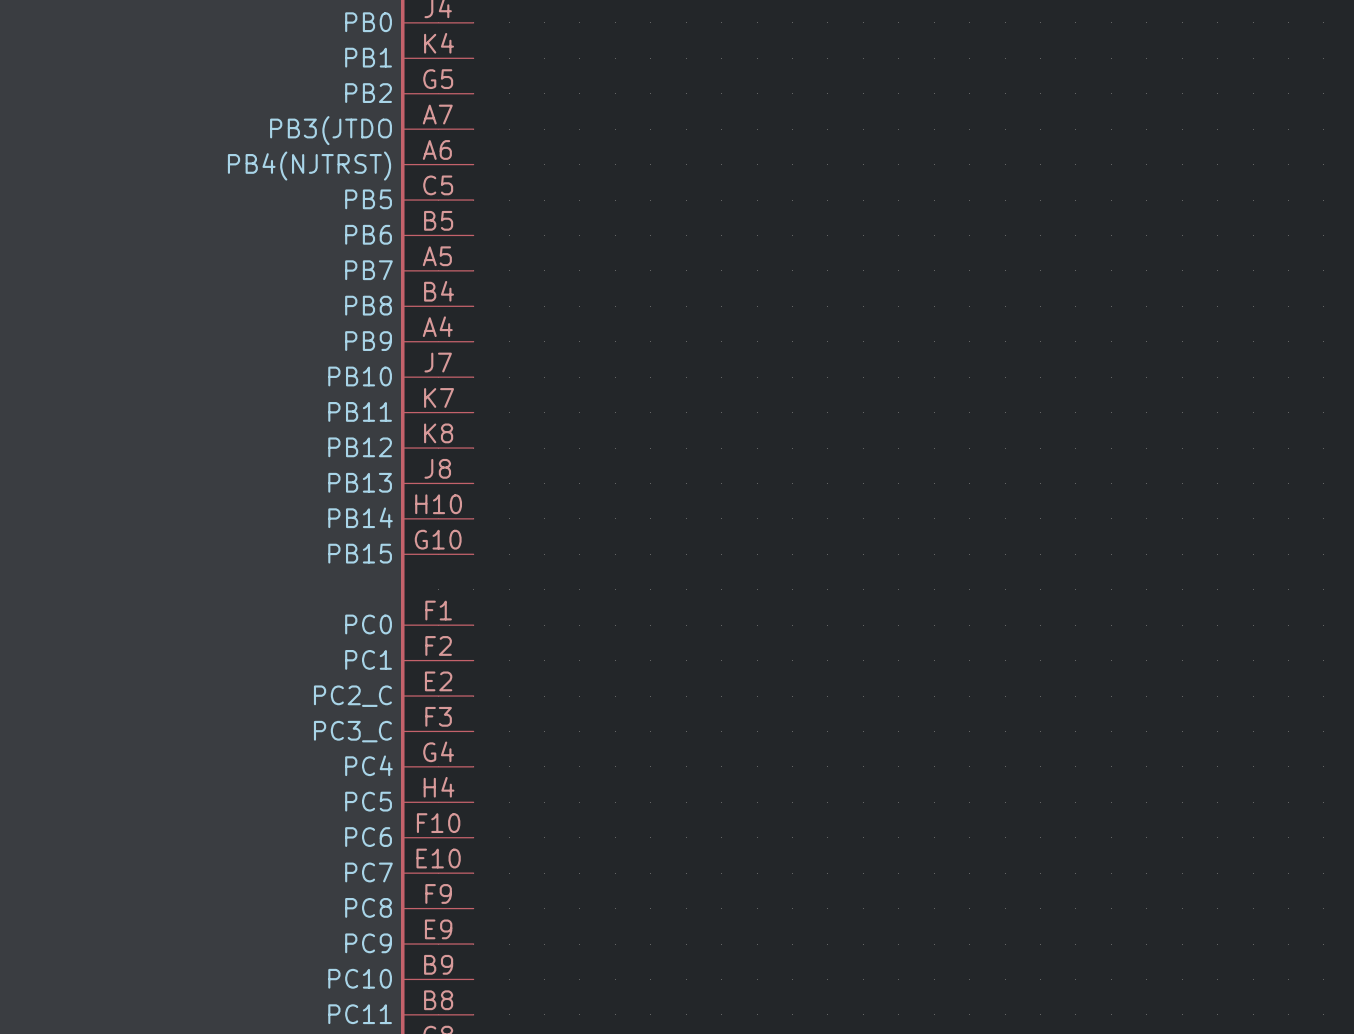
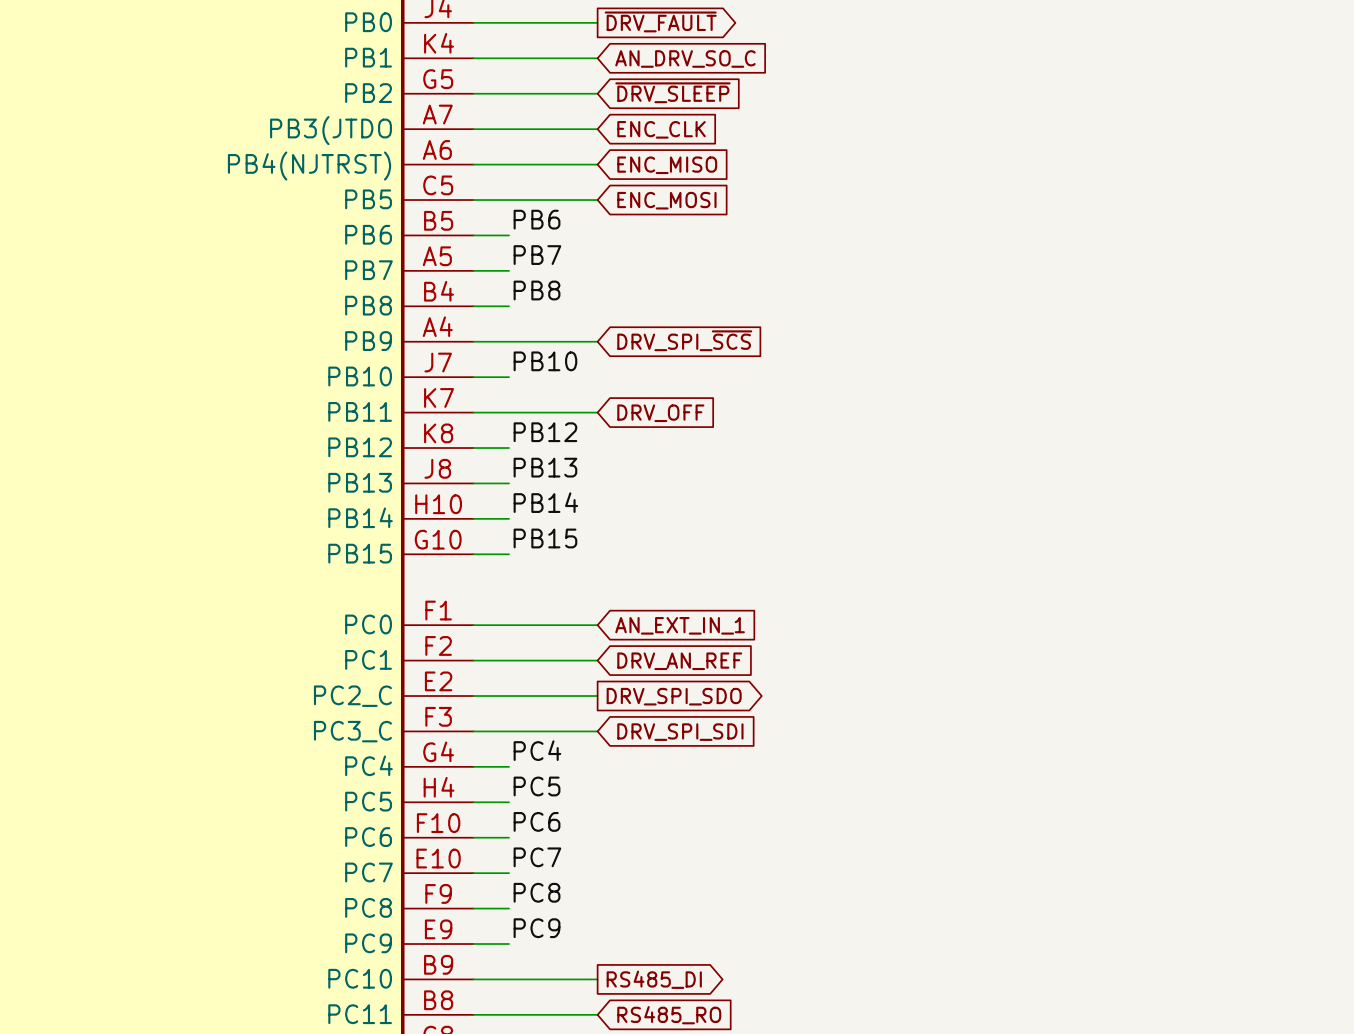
global label: none -> ~{DRV_FAULT} (660, 21)
wire: none -> (473, 22) (597, 22)
wire: none -> (473, 58) (597, 58)
global label: none -> AN_DRV_SO_C (685, 58)
global label: none -> ~{DRV_SLEEP} (672, 92)
wire: none -> (473, 93) (597, 93)
wire: none -> (473, 129) (597, 129)
global label: none -> ENC_CLK (661, 129)
wire: none -> (473, 164) (597, 164)
global label: none -> ENC_MISO (667, 165)
wire: none -> (473, 200) (597, 200)
global label: none -> ENC_MOSI (666, 200)
label: none -> PB6 (537, 219)
wire: none -> (473, 235) (509, 235)
label: none -> PB7 (537, 255)
wire: none -> (473, 270) (509, 270)
label: none -> PB8 (537, 290)
wire: none -> (473, 306) (509, 306)
global label: none -> DRV_SPI_~{SCS} (684, 340)
wire: none -> (473, 341) (597, 341)
label: none -> PB10 (545, 361)
wire: none -> (473, 377) (509, 377)
wire: none -> (473, 412) (597, 412)
global label: none -> DRV_OFF (660, 413)
label: none -> PB12 (545, 432)
wire: none -> (473, 448) (509, 448)
label: none -> PB13 (545, 467)
wire: none -> (473, 483) (509, 483)
label: none -> PB14 (545, 502)
wire: none -> (473, 518) (509, 518)
label: none -> PB15 (545, 538)
wire: none -> (473, 554) (509, 554)
wire: none -> (473, 625) (597, 625)
global label: none -> AN_EXT_IN_1 (680, 625)
wire: none -> (473, 660) (597, 660)
global label: none -> DRV_AN_REF (679, 661)
wire: none -> (473, 696) (597, 696)
global label: none -> DRV_SPI_SDO (674, 696)
wire: none -> (473, 731) (597, 731)
global label: none -> DRV_SPI_SDI (680, 732)
label: none -> PC4 (537, 750)
wire: none -> (473, 766) (509, 766)
label: none -> PC5 (537, 786)
wire: none -> (473, 802) (509, 802)
label: none -> PC6 (537, 821)
wire: none -> (473, 837) (509, 837)
label: none -> PC7 (537, 857)
wire: none -> (473, 873) (509, 873)
label: none -> PC8 (537, 892)
wire: none -> (473, 908) (509, 908)
label: none -> PC9 (537, 928)
wire: none -> (473, 944) (509, 944)
wire: none -> (473, 979) (597, 979)
global label: none -> RS485_DI (654, 979)
wire: none -> (473, 1014) (597, 1014)
global label: none -> RS485_RO (669, 1015)

